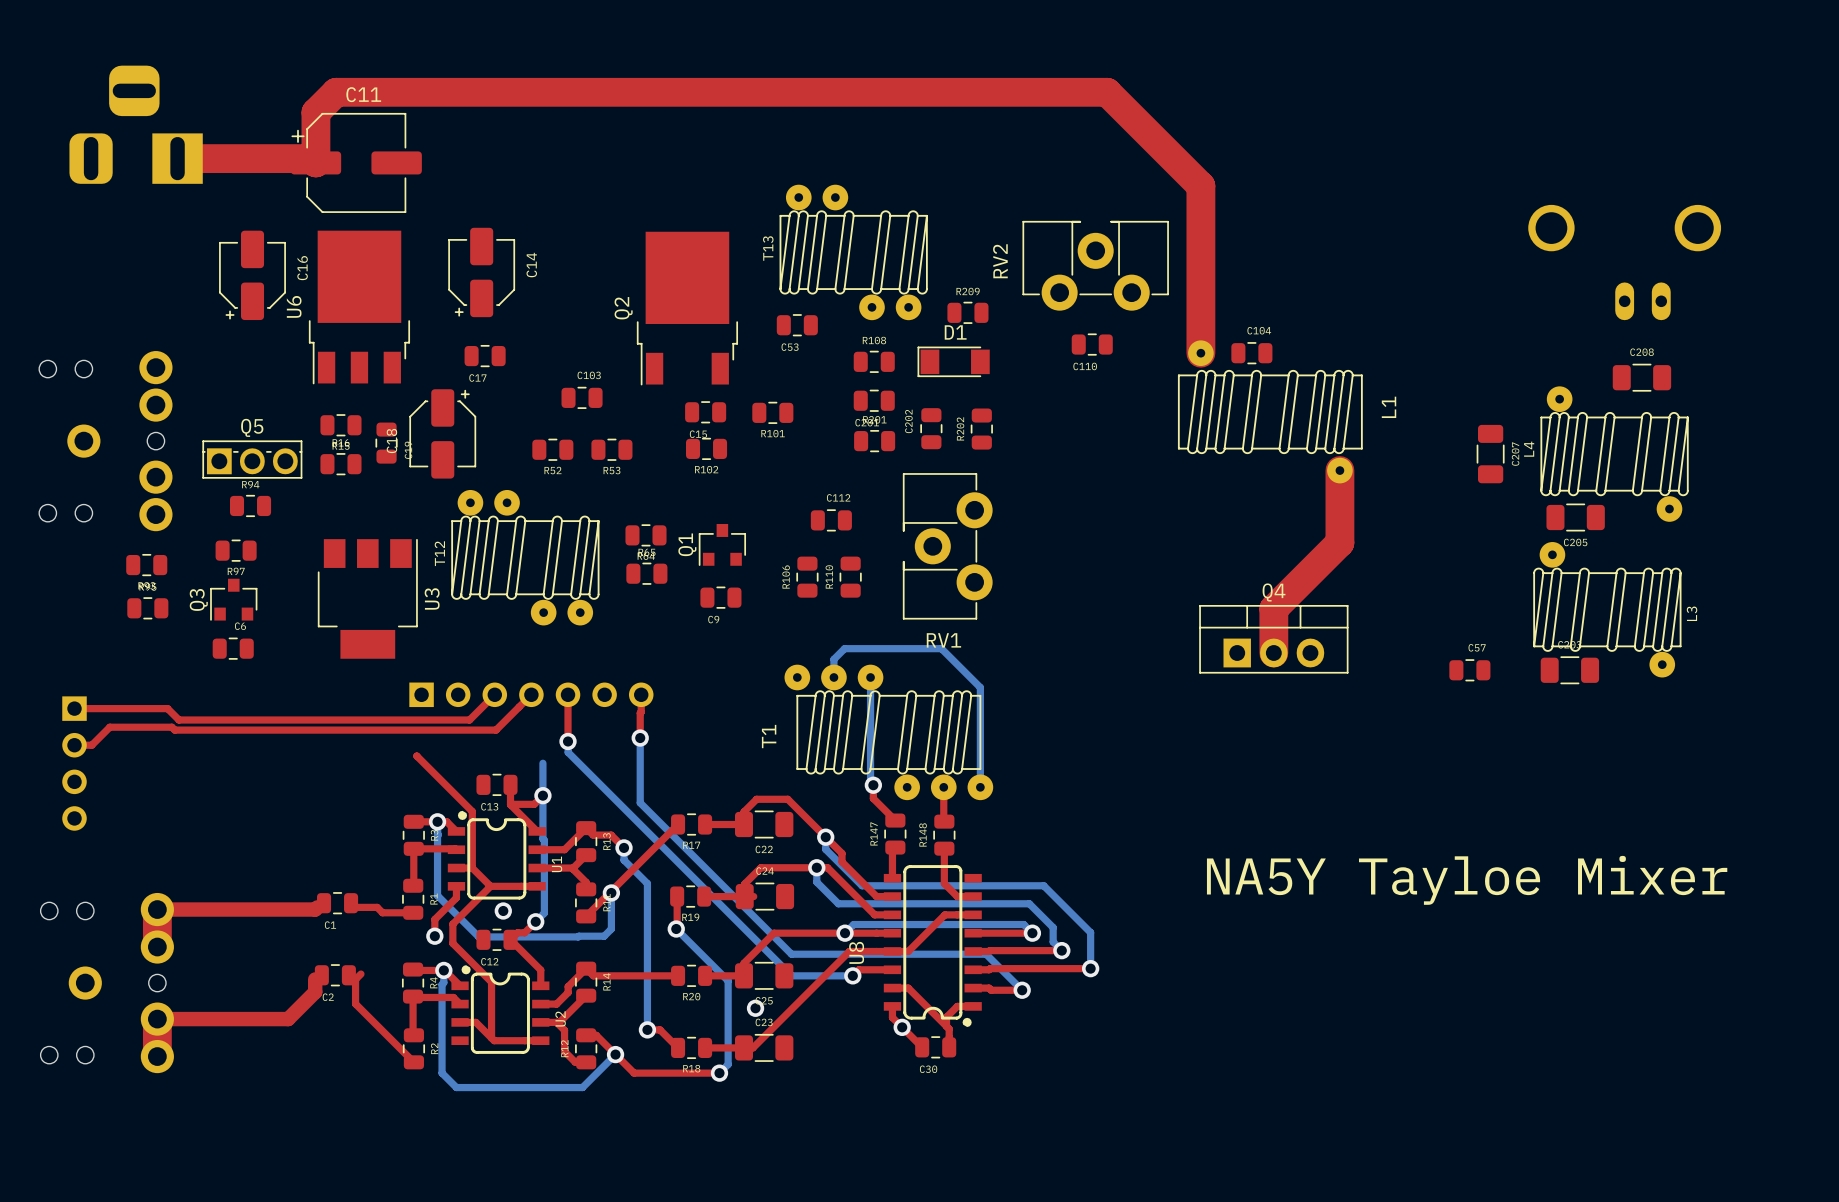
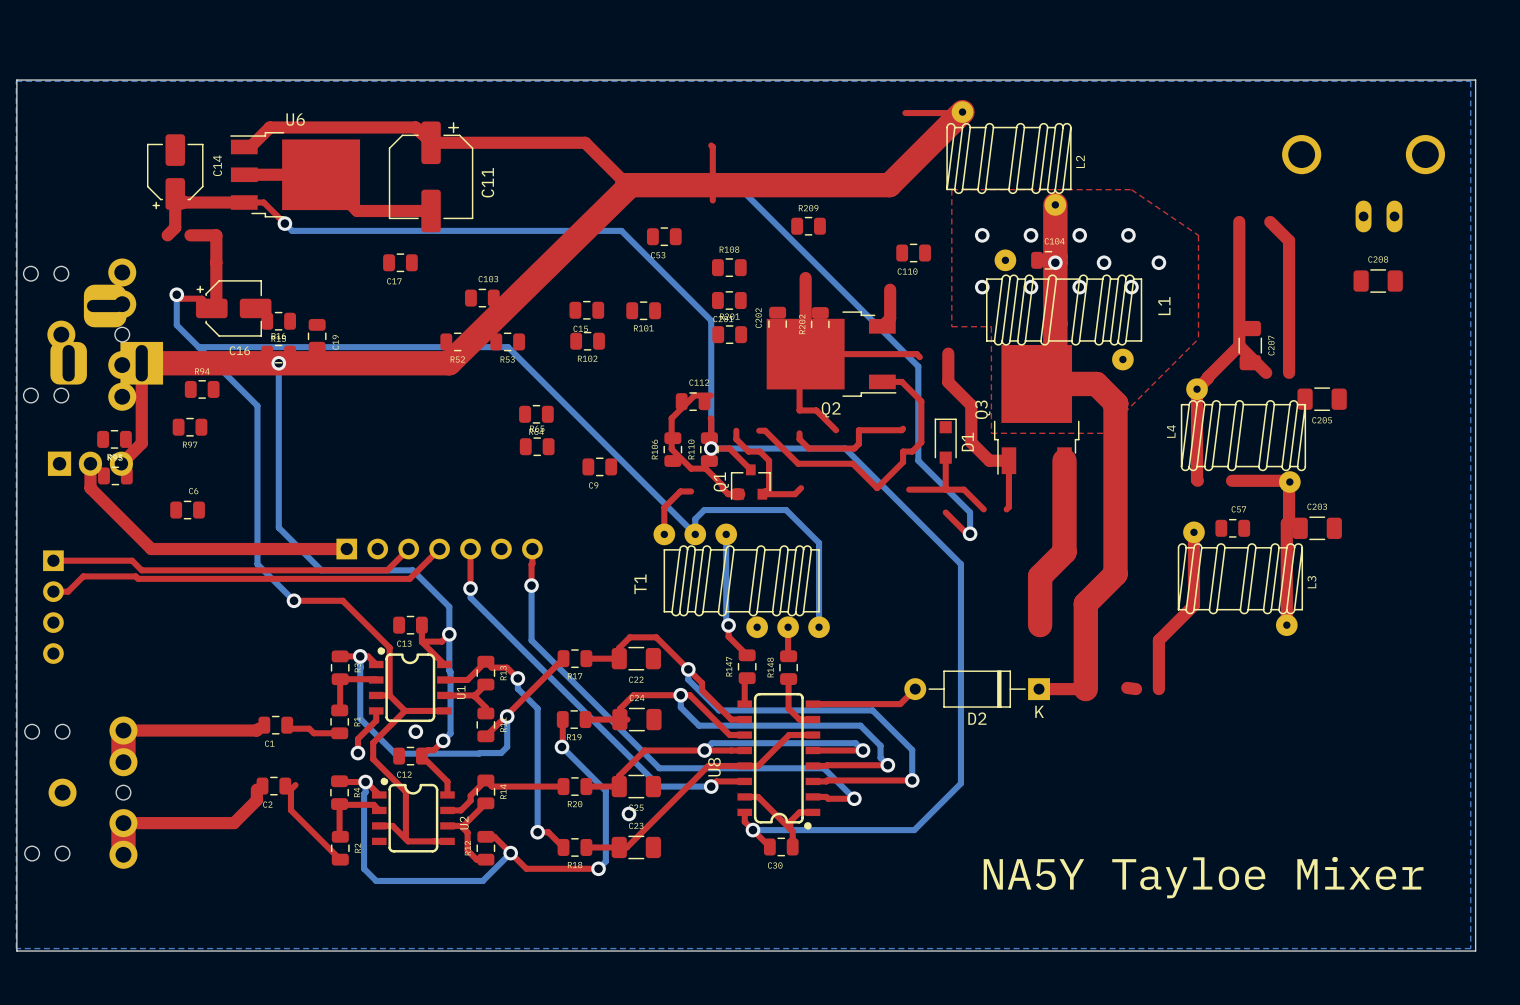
part position: (136, 124) -> (106, 334)
board edge: none -> (16, 80) (1475, 80) (1475, 951) (16, 951) (16, 80)
bottom zone outline: none -> (16, 81) (16, 948) (1470, 948) (1470, 81) (16, 81)
top track: (177, 158) (311, 158) (315, 162) (315, 112) (336, 92) (1107, 92) (1200, 185) (1200, 353) -> none
C11 rotation: 0° (356, 162) -> 90° clockwise (431, 176)
C11 position: (356, 162) -> (431, 176)
top track: none -> (905, 113) (962, 112) (889, 185) (627, 185) (629, 186)
top track: none -> (711, 145) (712, 147) (712, 200)
top track: none -> (244, 146) (250, 146) (269, 127) (415, 127) (431, 142) (585, 142) (629, 186)
L2: none -> (1008, 158)
top track: none -> (244, 174) (321, 174) (357, 210) (431, 210)
T13: (853, 252) -> none
bottom track: none -> (712, 185) (736, 185) (918, 366) (918, 460) (970, 512) (970, 533)
top track: none -> (629, 186) (449, 363) (141, 363) (141, 443) (121, 463)
RV2: (1095, 265) -> none
top zone outline: none -> (951, 189) (951, 326) (991, 326) (991, 433) (1104, 433) (1198, 338) (1198, 235) (1131, 189) (951, 189)
C14 position: (481, 272) -> (175, 172)
C16 rotation: 0° (252, 275) -> 90° clockwise (233, 308)
C16 position: (252, 275) -> (233, 308)
top track: none -> (1055, 204) (1055, 365) (1036, 383) (1096, 383) (1116, 403) (1115, 574) (1085, 603) (1085, 689) (1039, 689)
U6 rotation: 0° (359, 307) -> 90° clockwise (295, 174)
top track: none -> (1239, 221) (1239, 345)
top track: none -> (1270, 221) (1289, 240) (1289, 372)
Q2 rotation: 0° (687, 308) -> 90° counterclockwise (831, 354)
Q2 position: (687, 308) -> (831, 354)
top track: none -> (284, 223) (263, 202) (183, 202) (175, 193) (175, 227) (167, 235)
bottom track: none -> (284, 223) (292, 230) (621, 230) (711, 320) (711, 448) (845, 448) (960, 564) (960, 783) (914, 830) (752, 830)
via: none -> (284, 223)
top track: none -> (190, 235) (216, 235) (216, 303) (211, 308) (202, 298) (180, 298) (175, 293)
via: none -> (982, 235)
via: none -> (1031, 235)
via: none -> (1079, 235)
via: none -> (1128, 235)
D1 name position: D1 (955, 332) -> D1 (967, 442)
D1 footprint: [917, 346, 990, 378] -> [934, 418, 957, 464]
via: none -> (1055, 262)
via: none -> (1104, 262)
via: none -> (1158, 262)
top track: none -> (805, 277) (805, 354)
via: none -> (982, 287)
via: none -> (1031, 287)
via: none -> (1079, 287)
via: none -> (1131, 287)
top track: none -> (890, 289) (890, 318) (882, 326)
bottom track: none -> (176, 294) (176, 325) (257, 405) (257, 564) (294, 600)
via: none -> (176, 294)
C18: (442, 433) -> none
top track: none -> (1239, 345) (1266, 372)
top track: none -> (1239, 345) (1197, 389) (1197, 480)
L4 position: (1614, 454) -> (1243, 435)
bottom track: none -> (198, 347) (507, 347) (695, 534)
Q5: (252, 459) -> none
top track: none -> (948, 353) (948, 382) (971, 405) (971, 442) (989, 460) (1008, 460) (1008, 507) (1006, 509)
top track: none -> (805, 354) (799, 360) (799, 410) (816, 410) (836, 430)
top track: none -> (805, 354) (916, 354) (919, 357)
top track: (1339, 470) (1339, 542) (1273, 608) (1273, 652) -> none
bottom track: none -> (278, 363) (278, 527) (321, 570) (412, 570) (449, 606)
via: none -> (278, 363)
top track: none -> (882, 381) (901, 381) (921, 401) (921, 442) (912, 451) (903, 451) (903, 462) (877, 488) (852, 463) (798, 463) (765, 430) (759, 430)
top track: none -> (710, 395) (694, 395) (671, 418) (671, 449) (691, 468) (705, 468) (722, 485) (722, 488) (728, 494) (739, 494) (735, 494)
top track: none -> (710, 418) (711, 448) (729, 448) (750, 469)
Q1 position: (722, 544) -> (750, 482)
RV1: (947, 546) -> none
top track: none -> (903, 428) (858, 430) (858, 443) (854, 448) (808, 448) (799, 439) (799, 433)
top track: none -> (736, 430) (736, 439) (748, 451) (759, 451) (769, 460) (769, 491) (765, 491) (762, 494) (794, 494) (801, 488)
T12: (525, 557) -> none
via: none -> (711, 448)
Q3 footprint: [210, 578, 258, 621] -> [993, 344, 1080, 475]
top track: none -> (945, 457) (945, 489)
top track: none -> (1064, 460) (1064, 552) (1040, 576) (1040, 625)
top track: none -> (90, 463) (90, 488) (151, 549) (346, 549)
part: none -> (90, 463)
U3: (367, 598) -> none
Q3 name position: Q3 (198, 599) -> Q3 (982, 409)
L3 position: (1607, 609) -> (1240, 578)
top track: none -> (1231, 480) (1289, 482) (1289, 521) (1286, 523) (1286, 625)
top track: none -> (909, 489) (964, 489) (983, 509)
top track: none -> (691, 491) (680, 491) (664, 507) (664, 534)
Q4: (1273, 639) -> none
top track: none -> (945, 512) (967, 533) (970, 533)
top track: none -> (1193, 532) (1193, 605) (1158, 640) (1158, 689)
via: none -> (970, 533)
top track: none -> (294, 600) (342, 600)
via: none -> (294, 600)
top track: none -> (1127, 687) (1136, 689)
top track: none -> (915, 689) (900, 704) (812, 704)
D2: none -> (977, 689)
text position: NA5Y Tayloe Mixer (1467, 880) -> NA5Y Tayloe Mixer (1203, 877)

